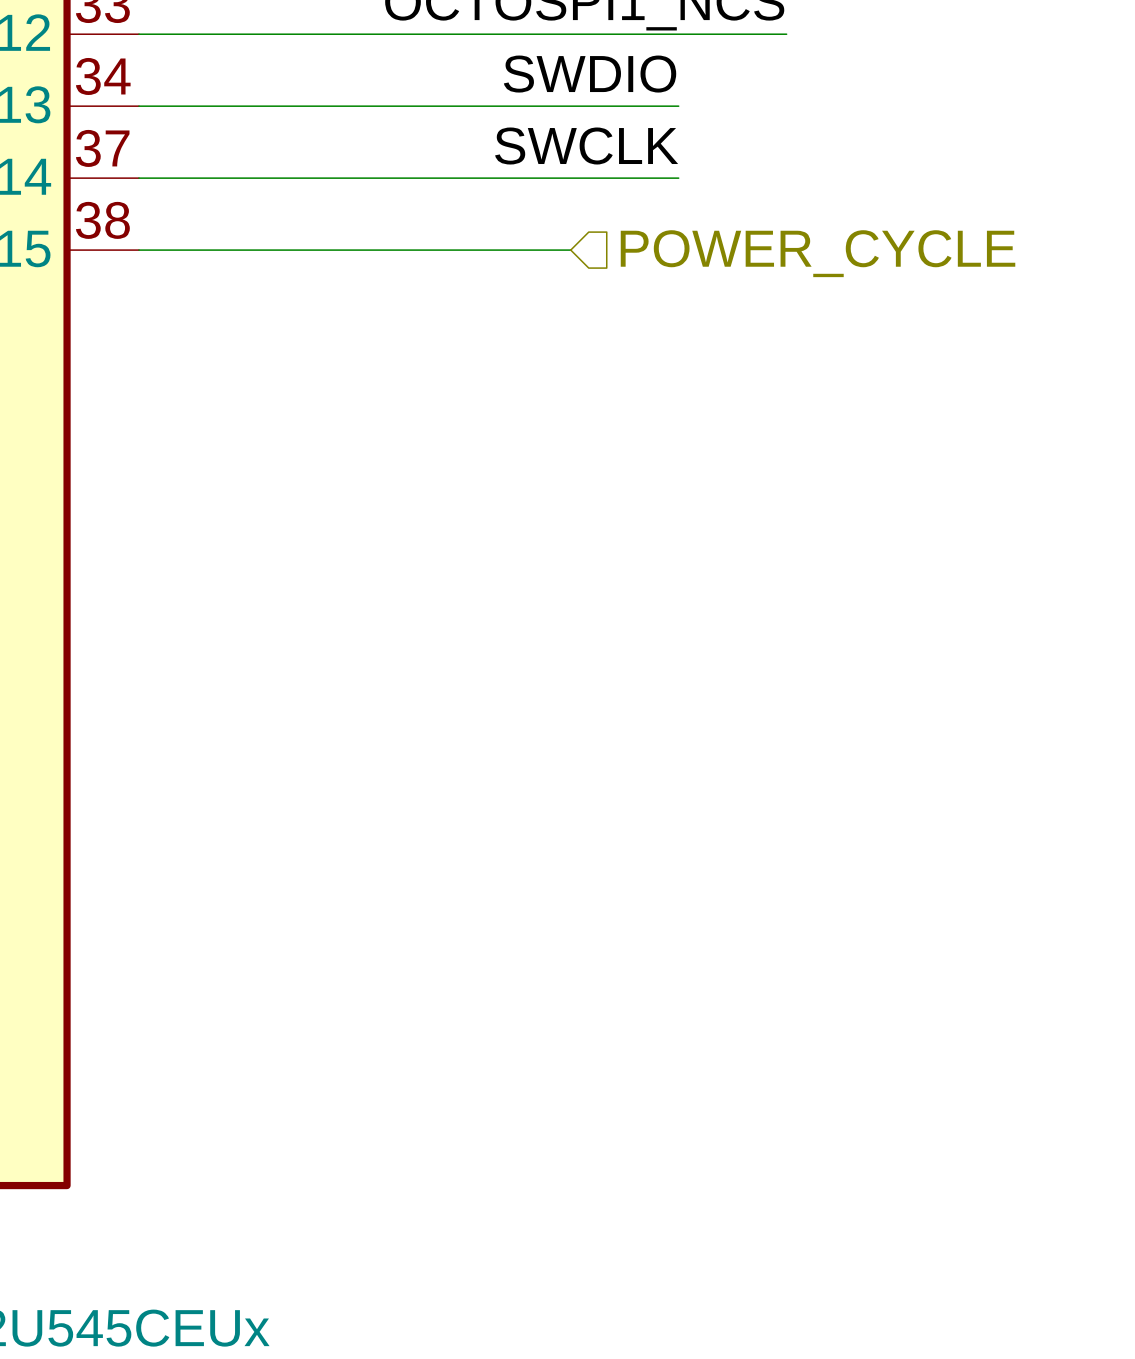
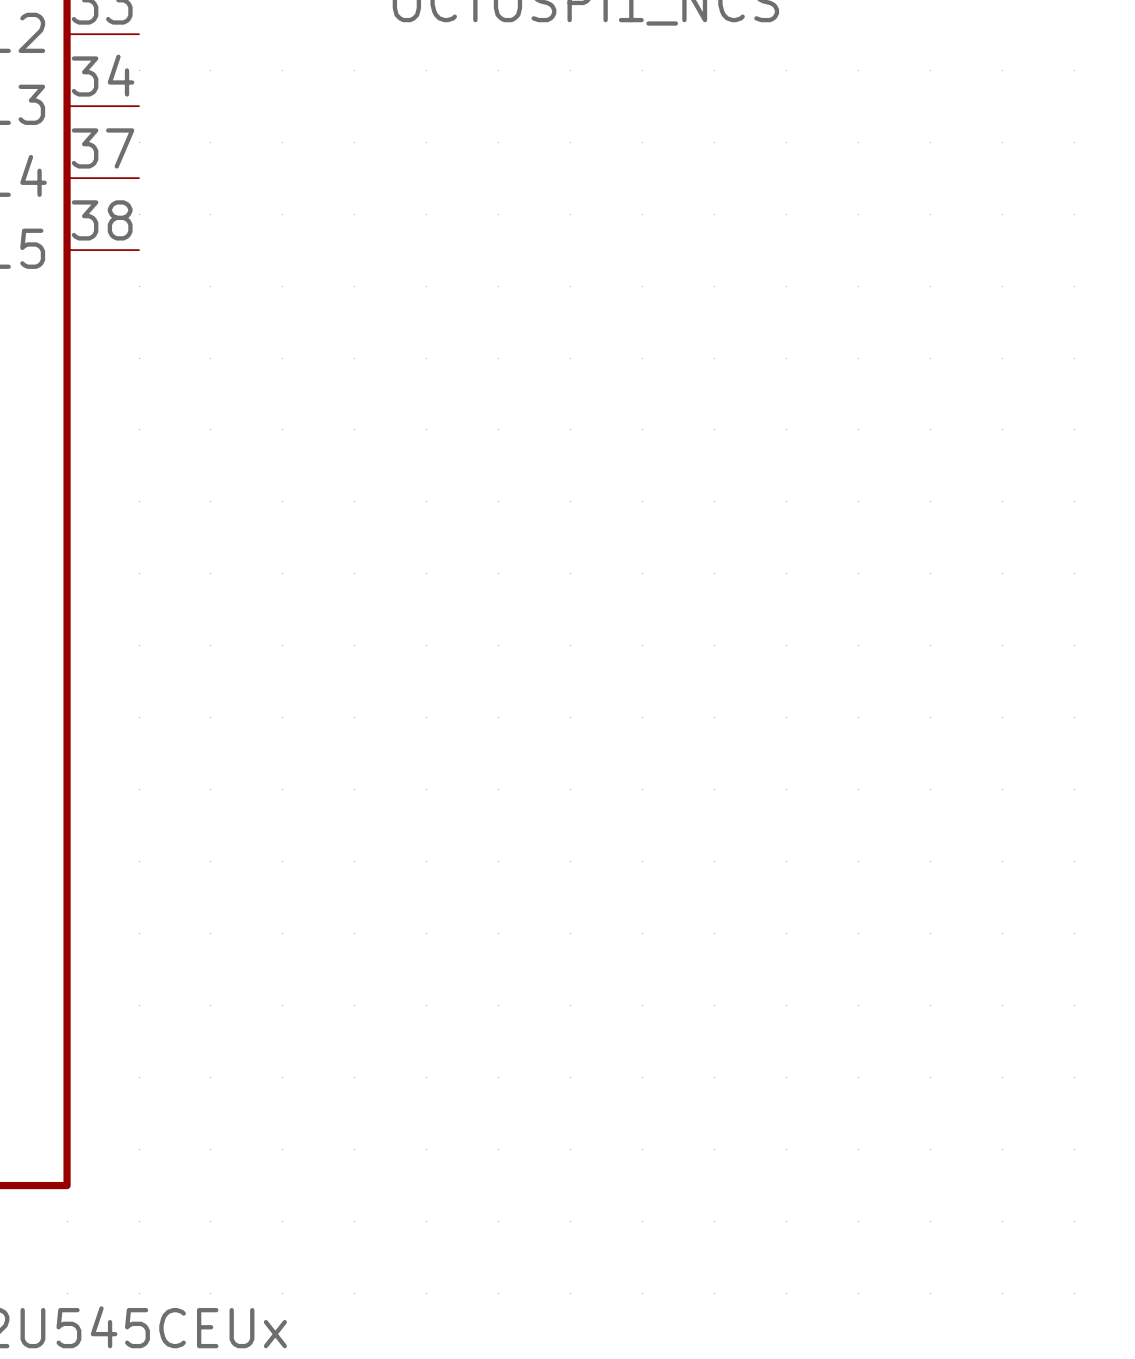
wire: (139, 34) (786, 34) -> none
label: SWDIO (590, 74) -> none
wire: (139, 106) (678, 106) -> none
label: SWCLK (586, 146) -> none
wire: (139, 178) (678, 178) -> none
wire: (139, 250) (570, 250) -> none
hierarchical label: POWER_CYCLE (818, 253) -> none

